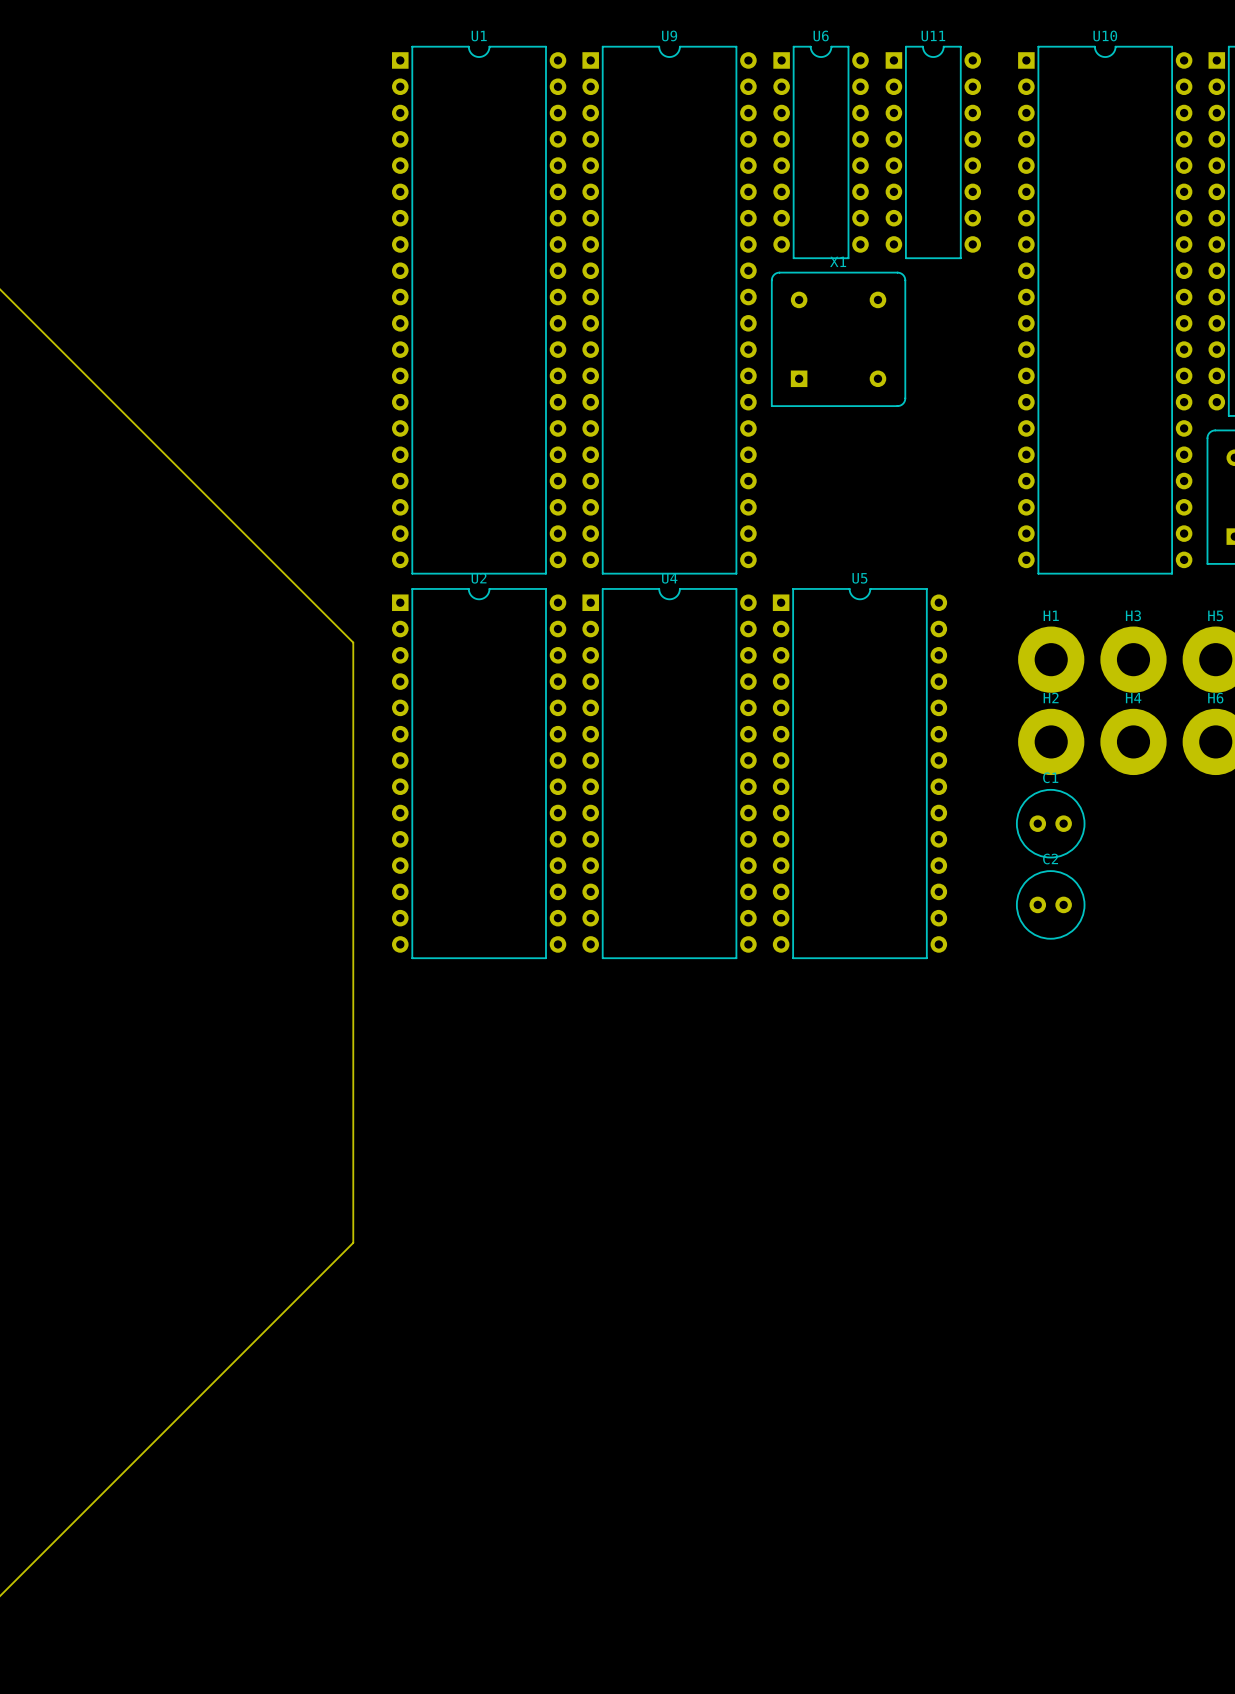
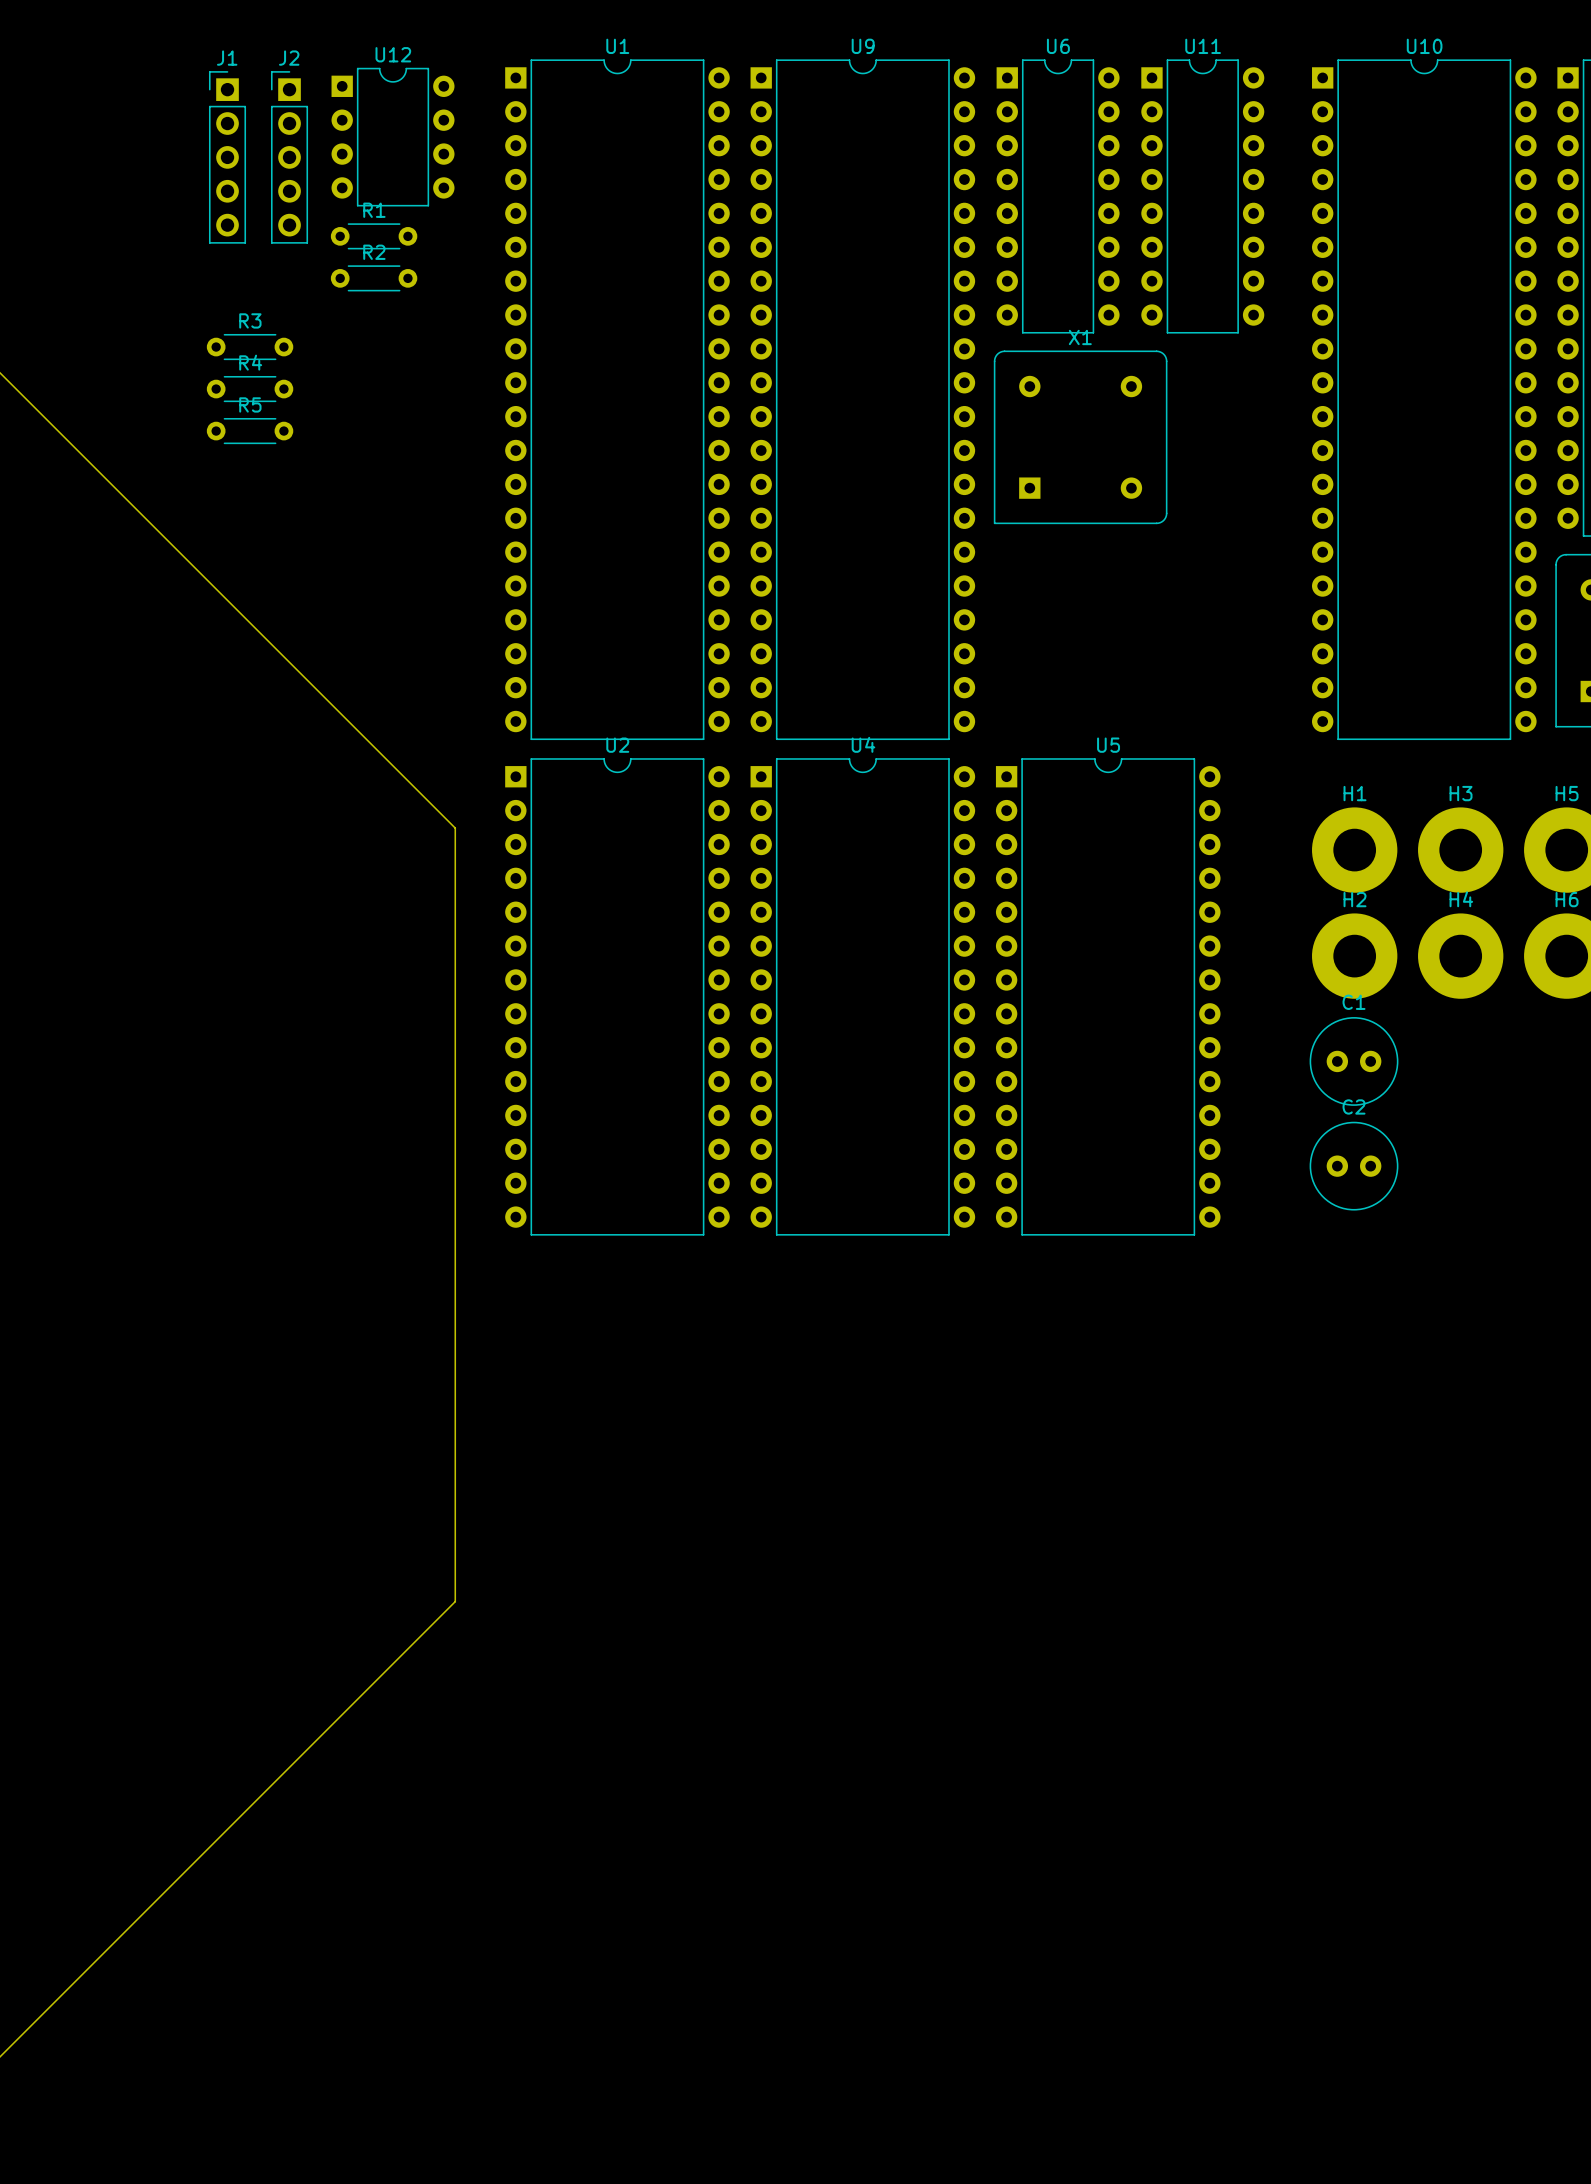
U12: none -> (393, 137)
J1: none -> (227, 157)
J2: none -> (289, 157)
R1: none -> (374, 236)
R2: none -> (374, 278)
R3: none -> (250, 347)
R4: none -> (250, 389)
R5: none -> (250, 431)

